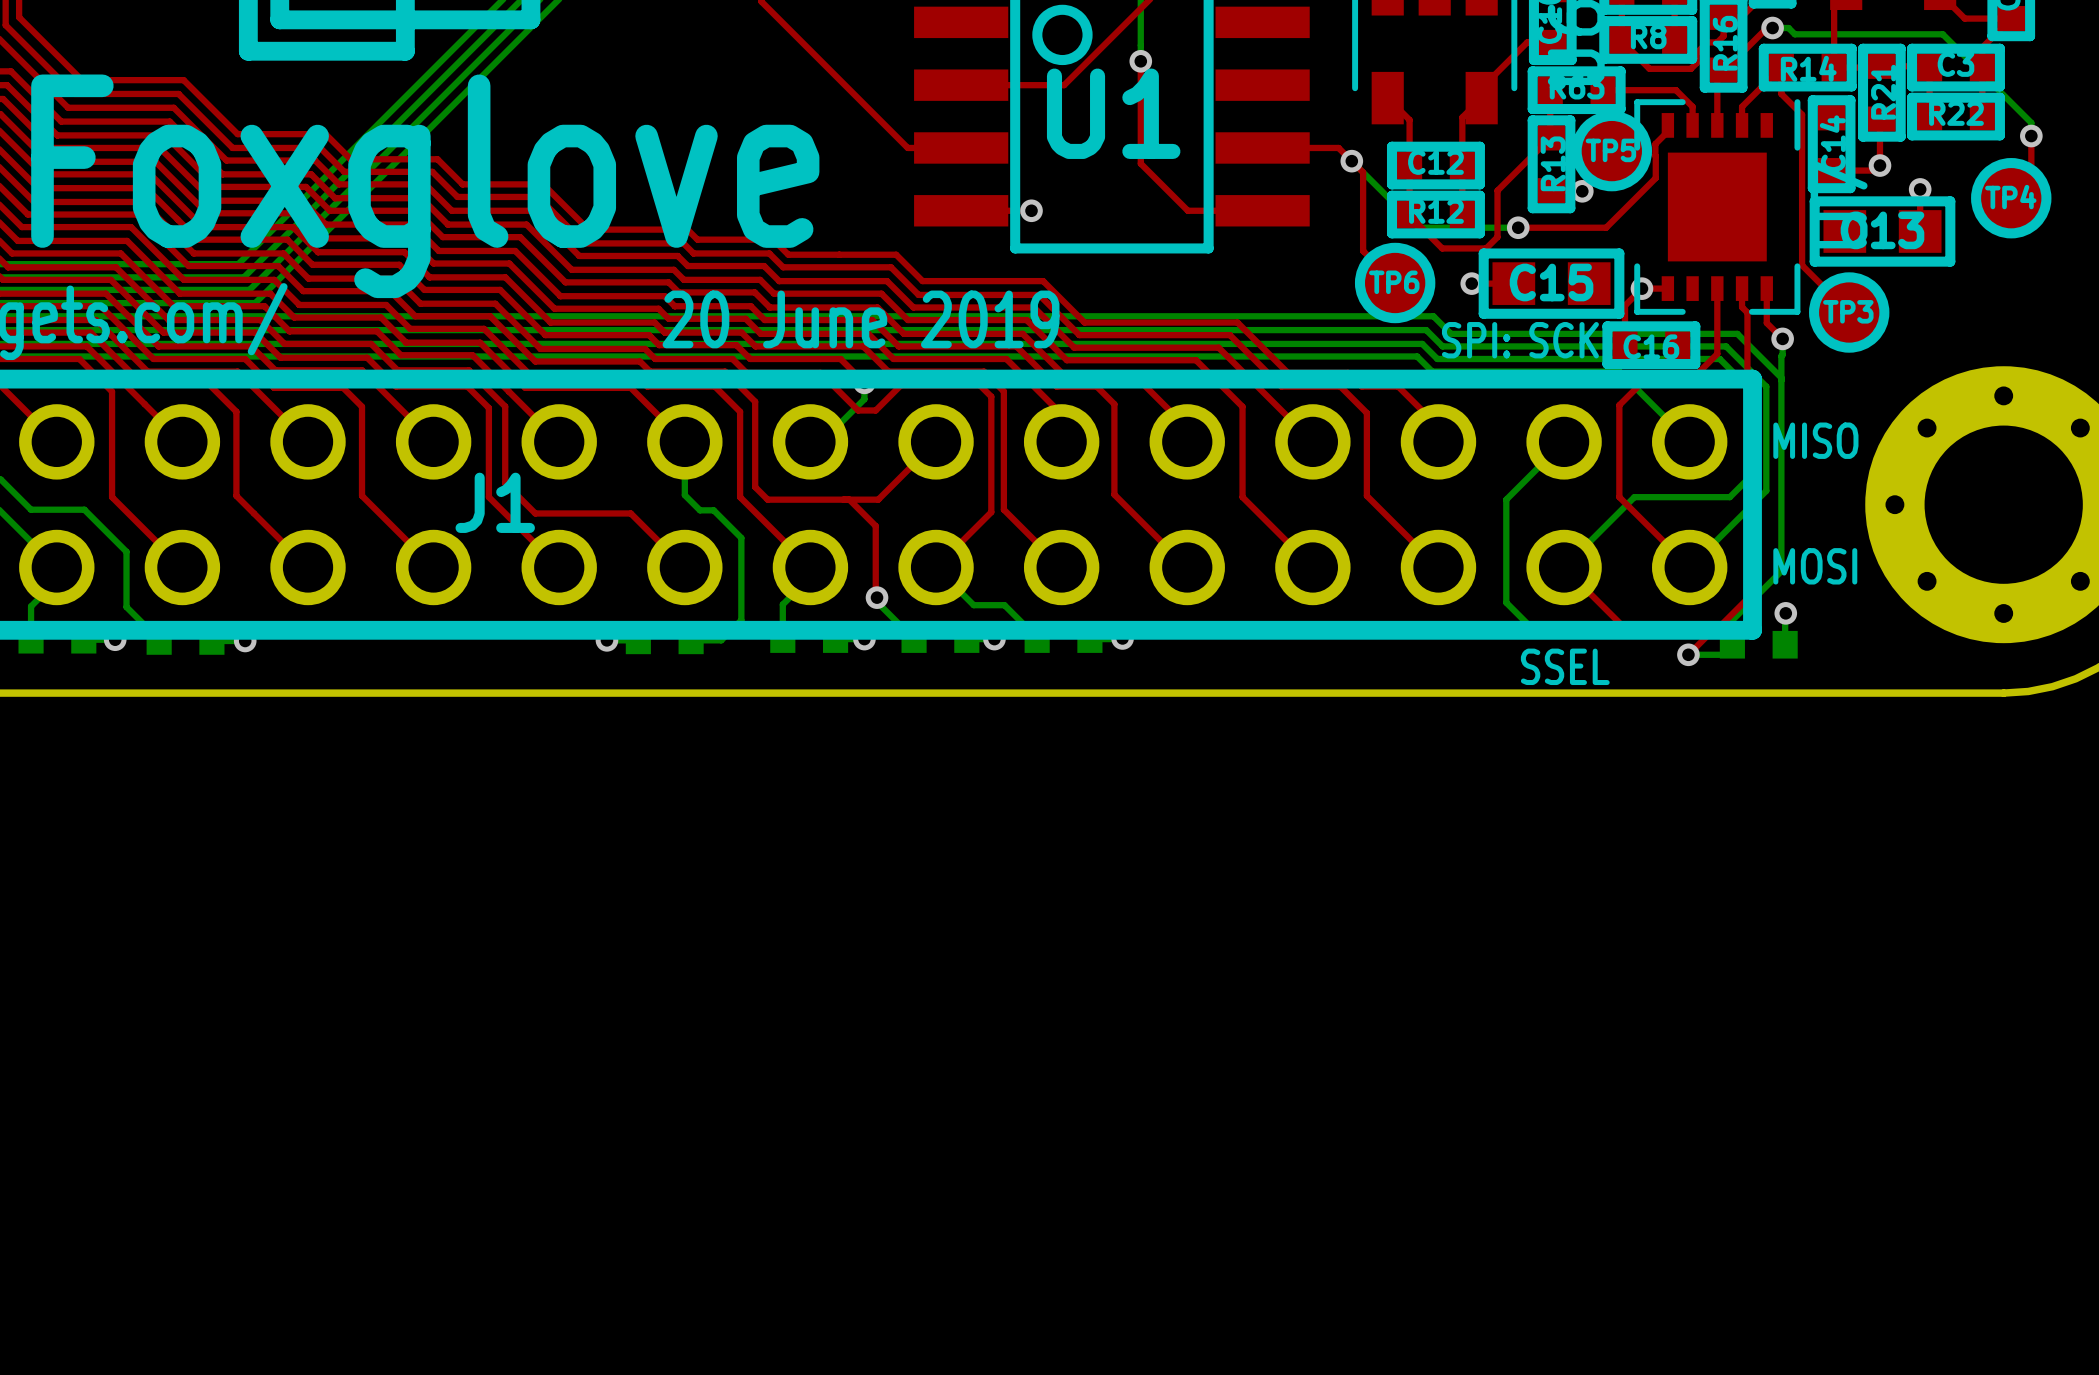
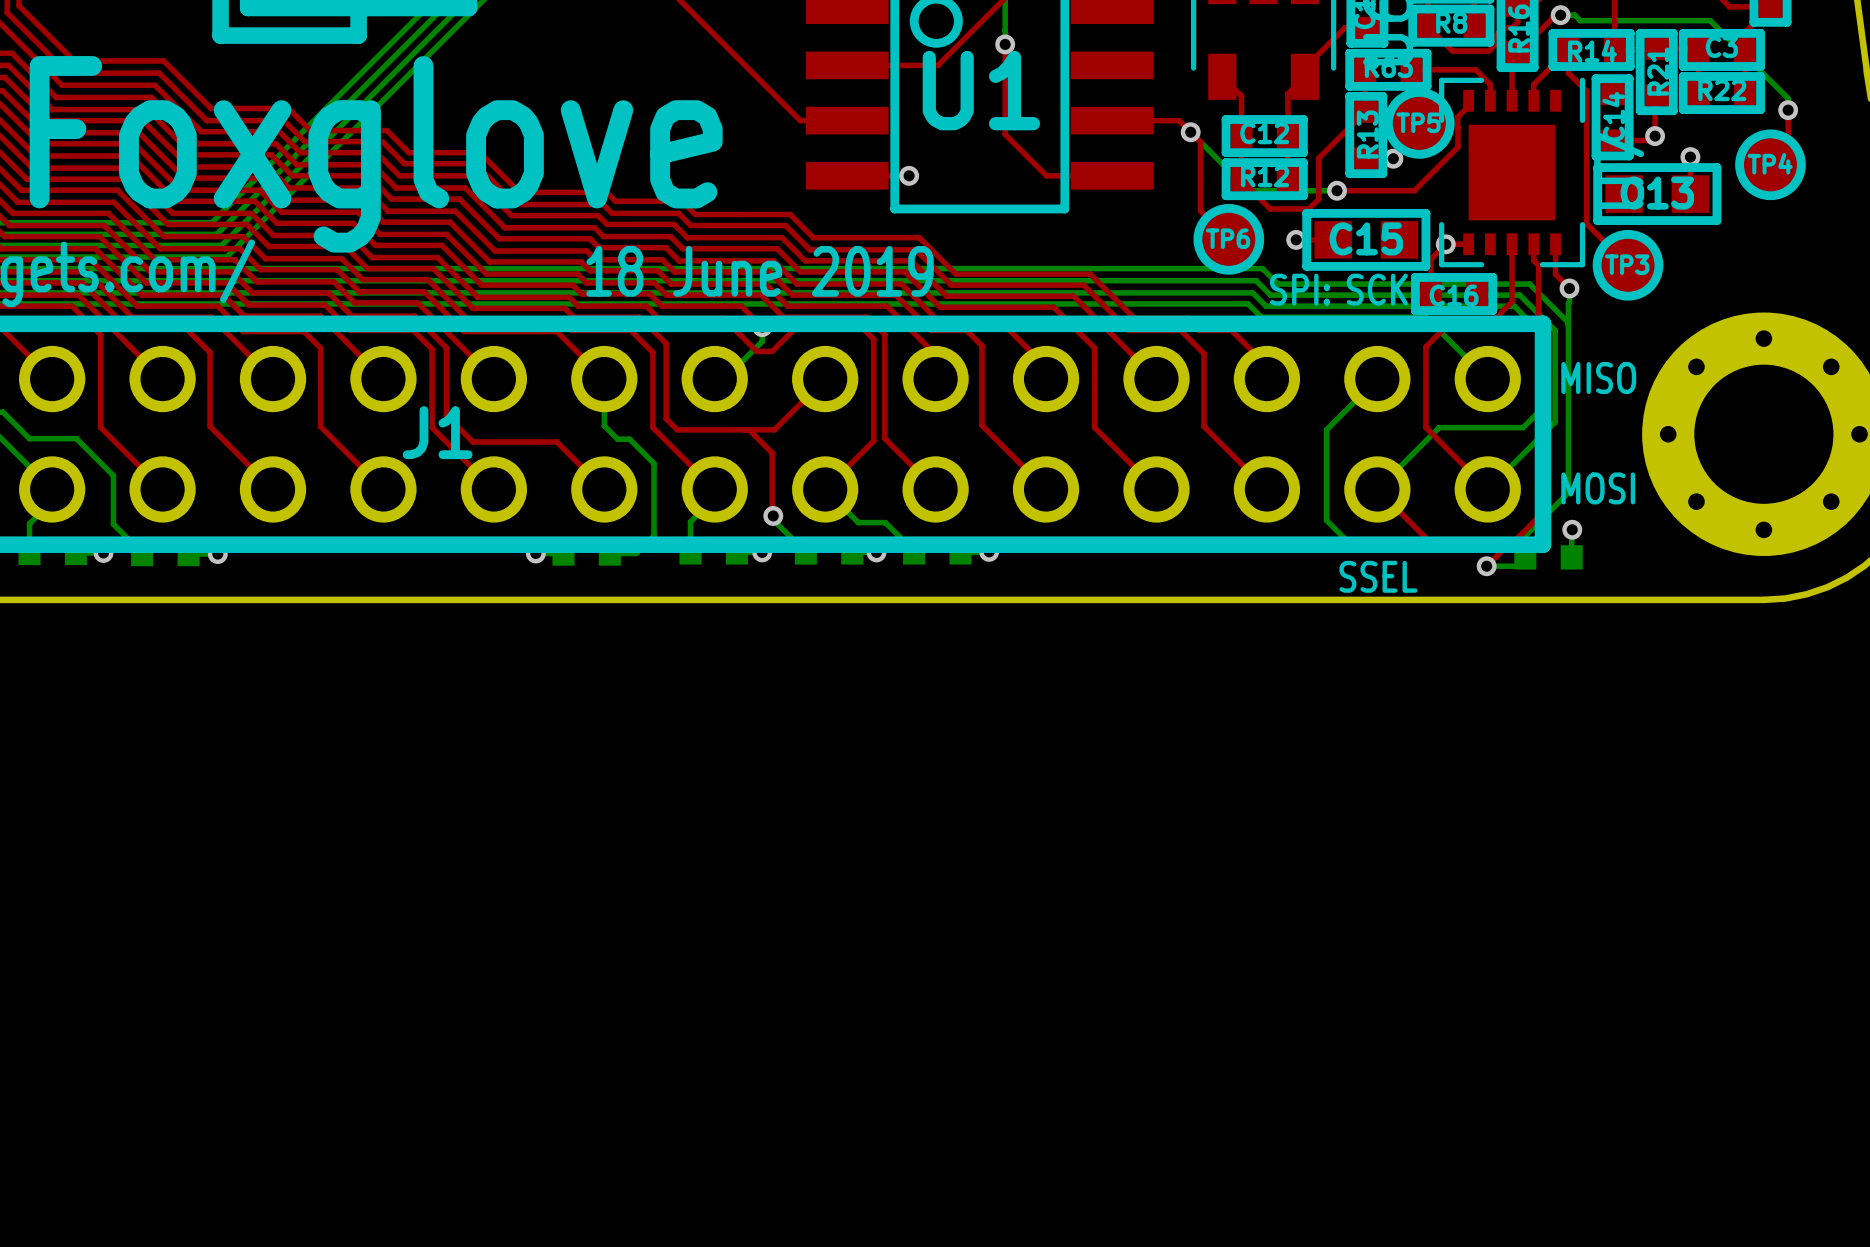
text: 20 June 2019 (861, 319) -> 18 June 2019 (760, 271)

